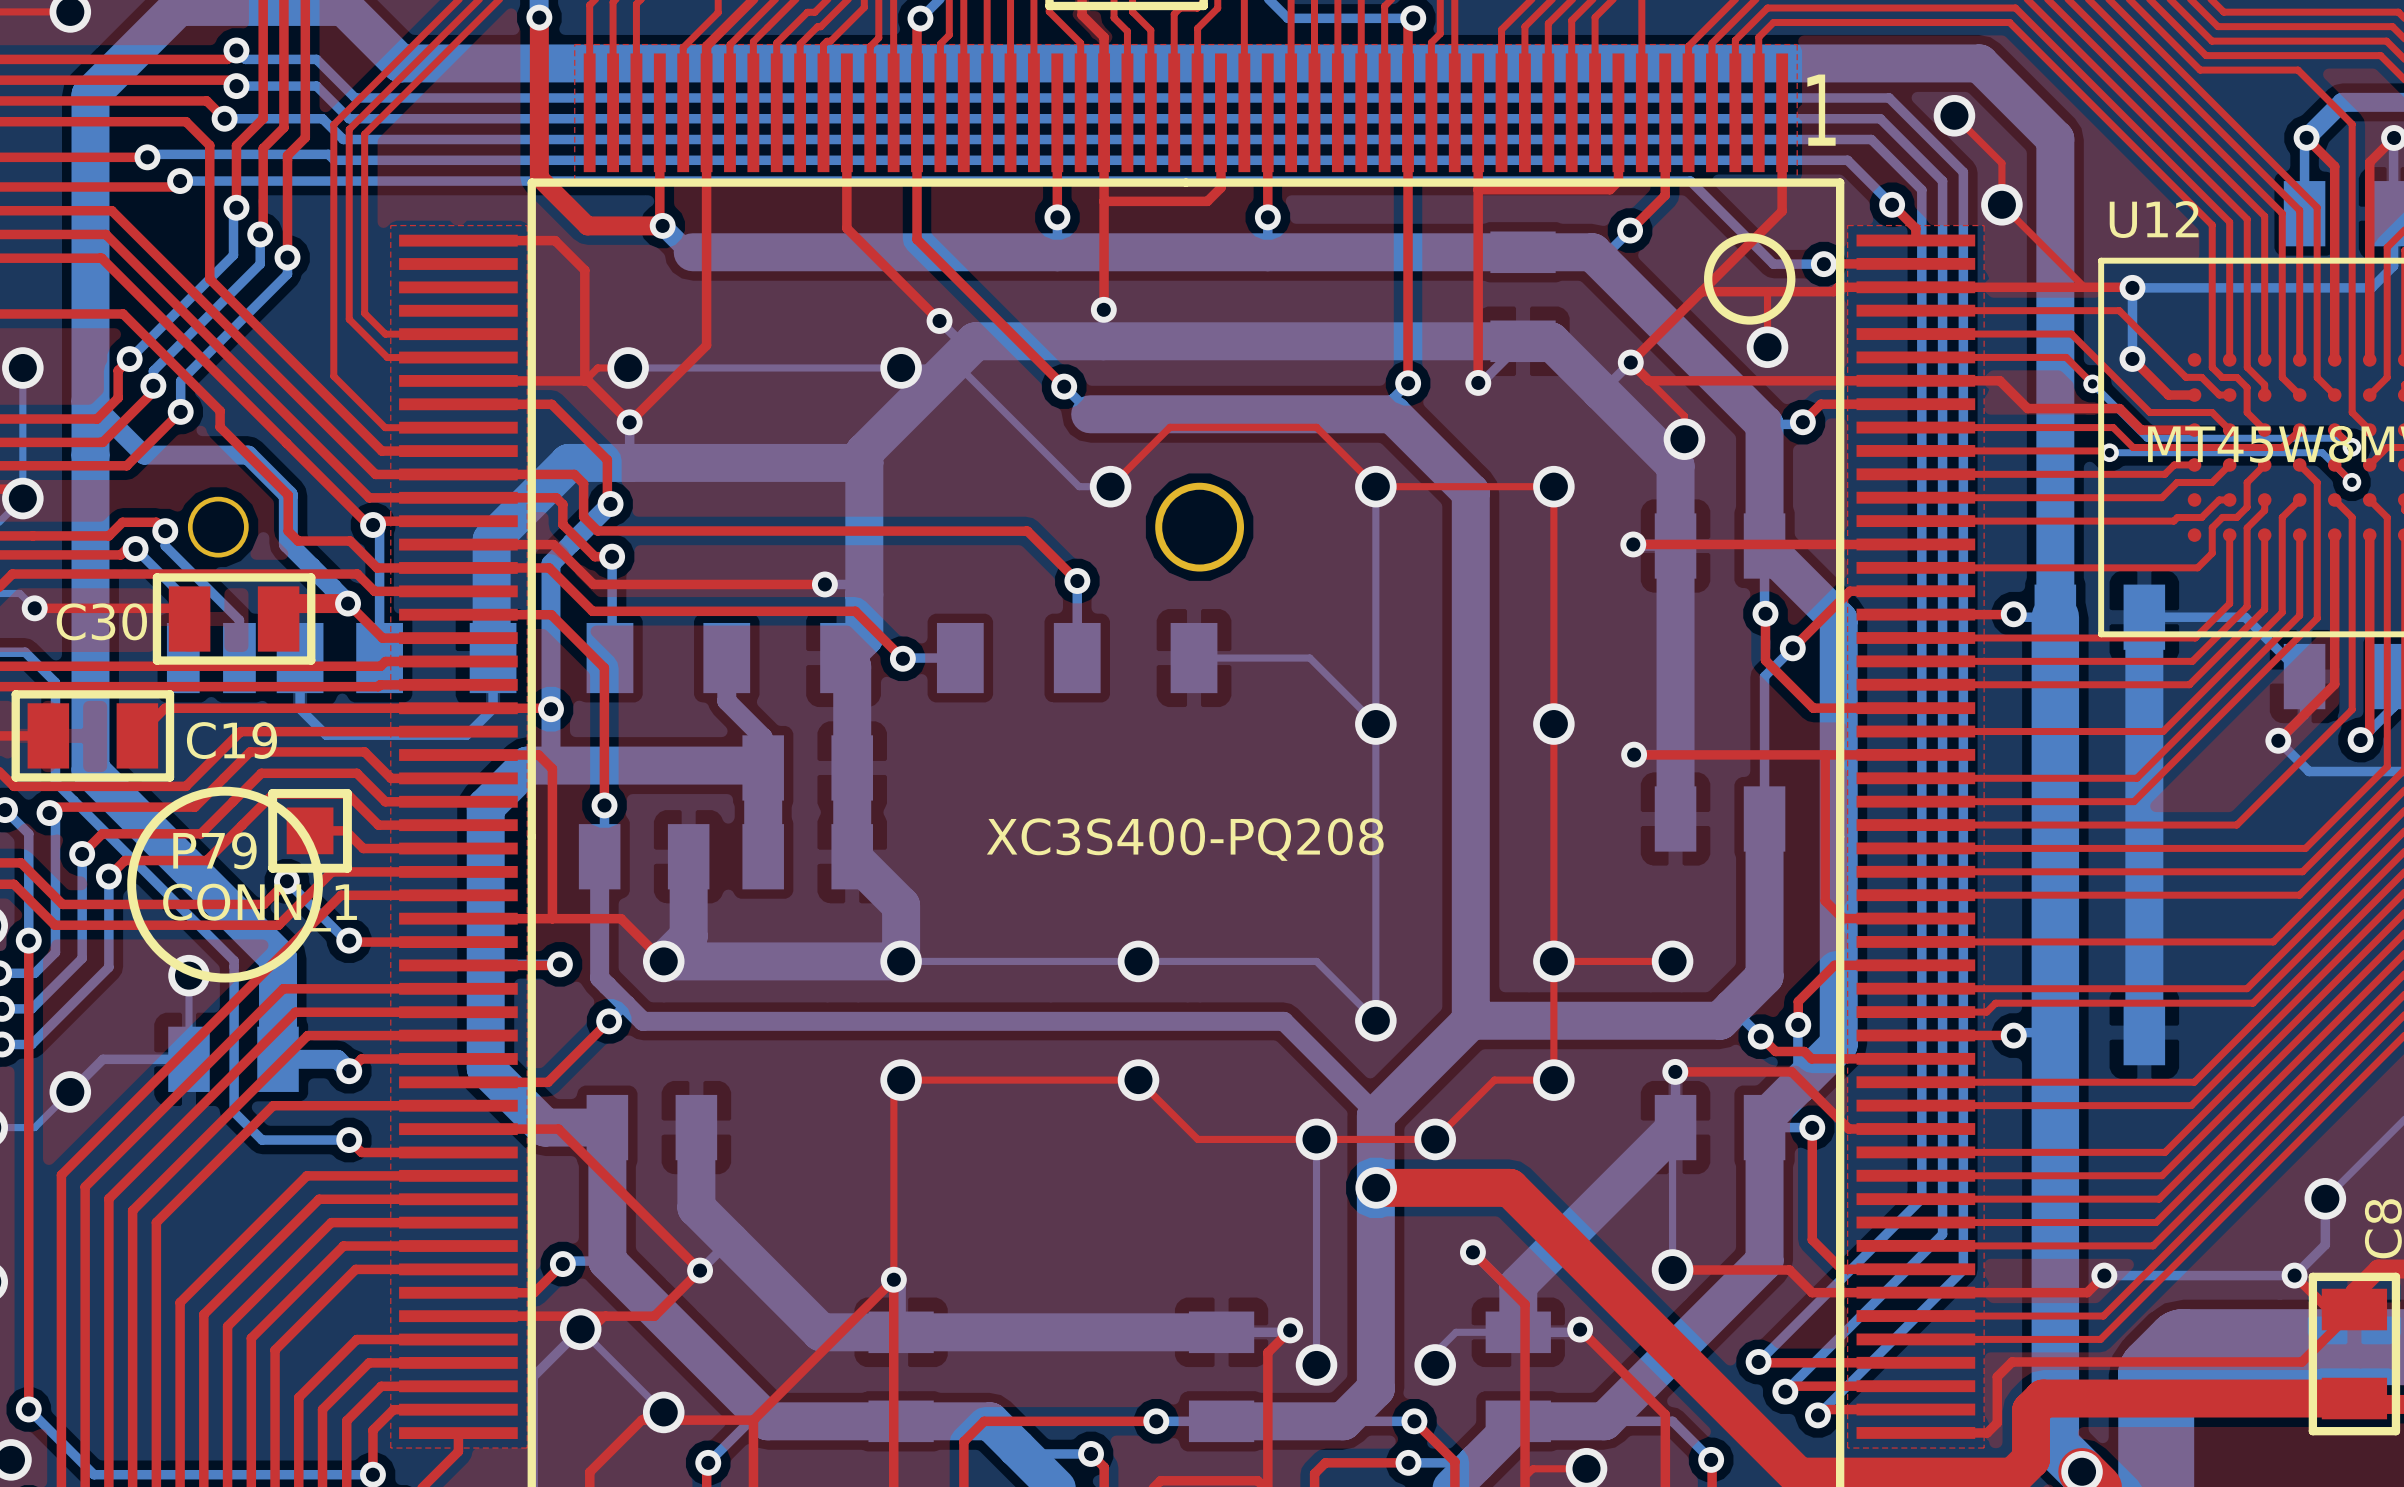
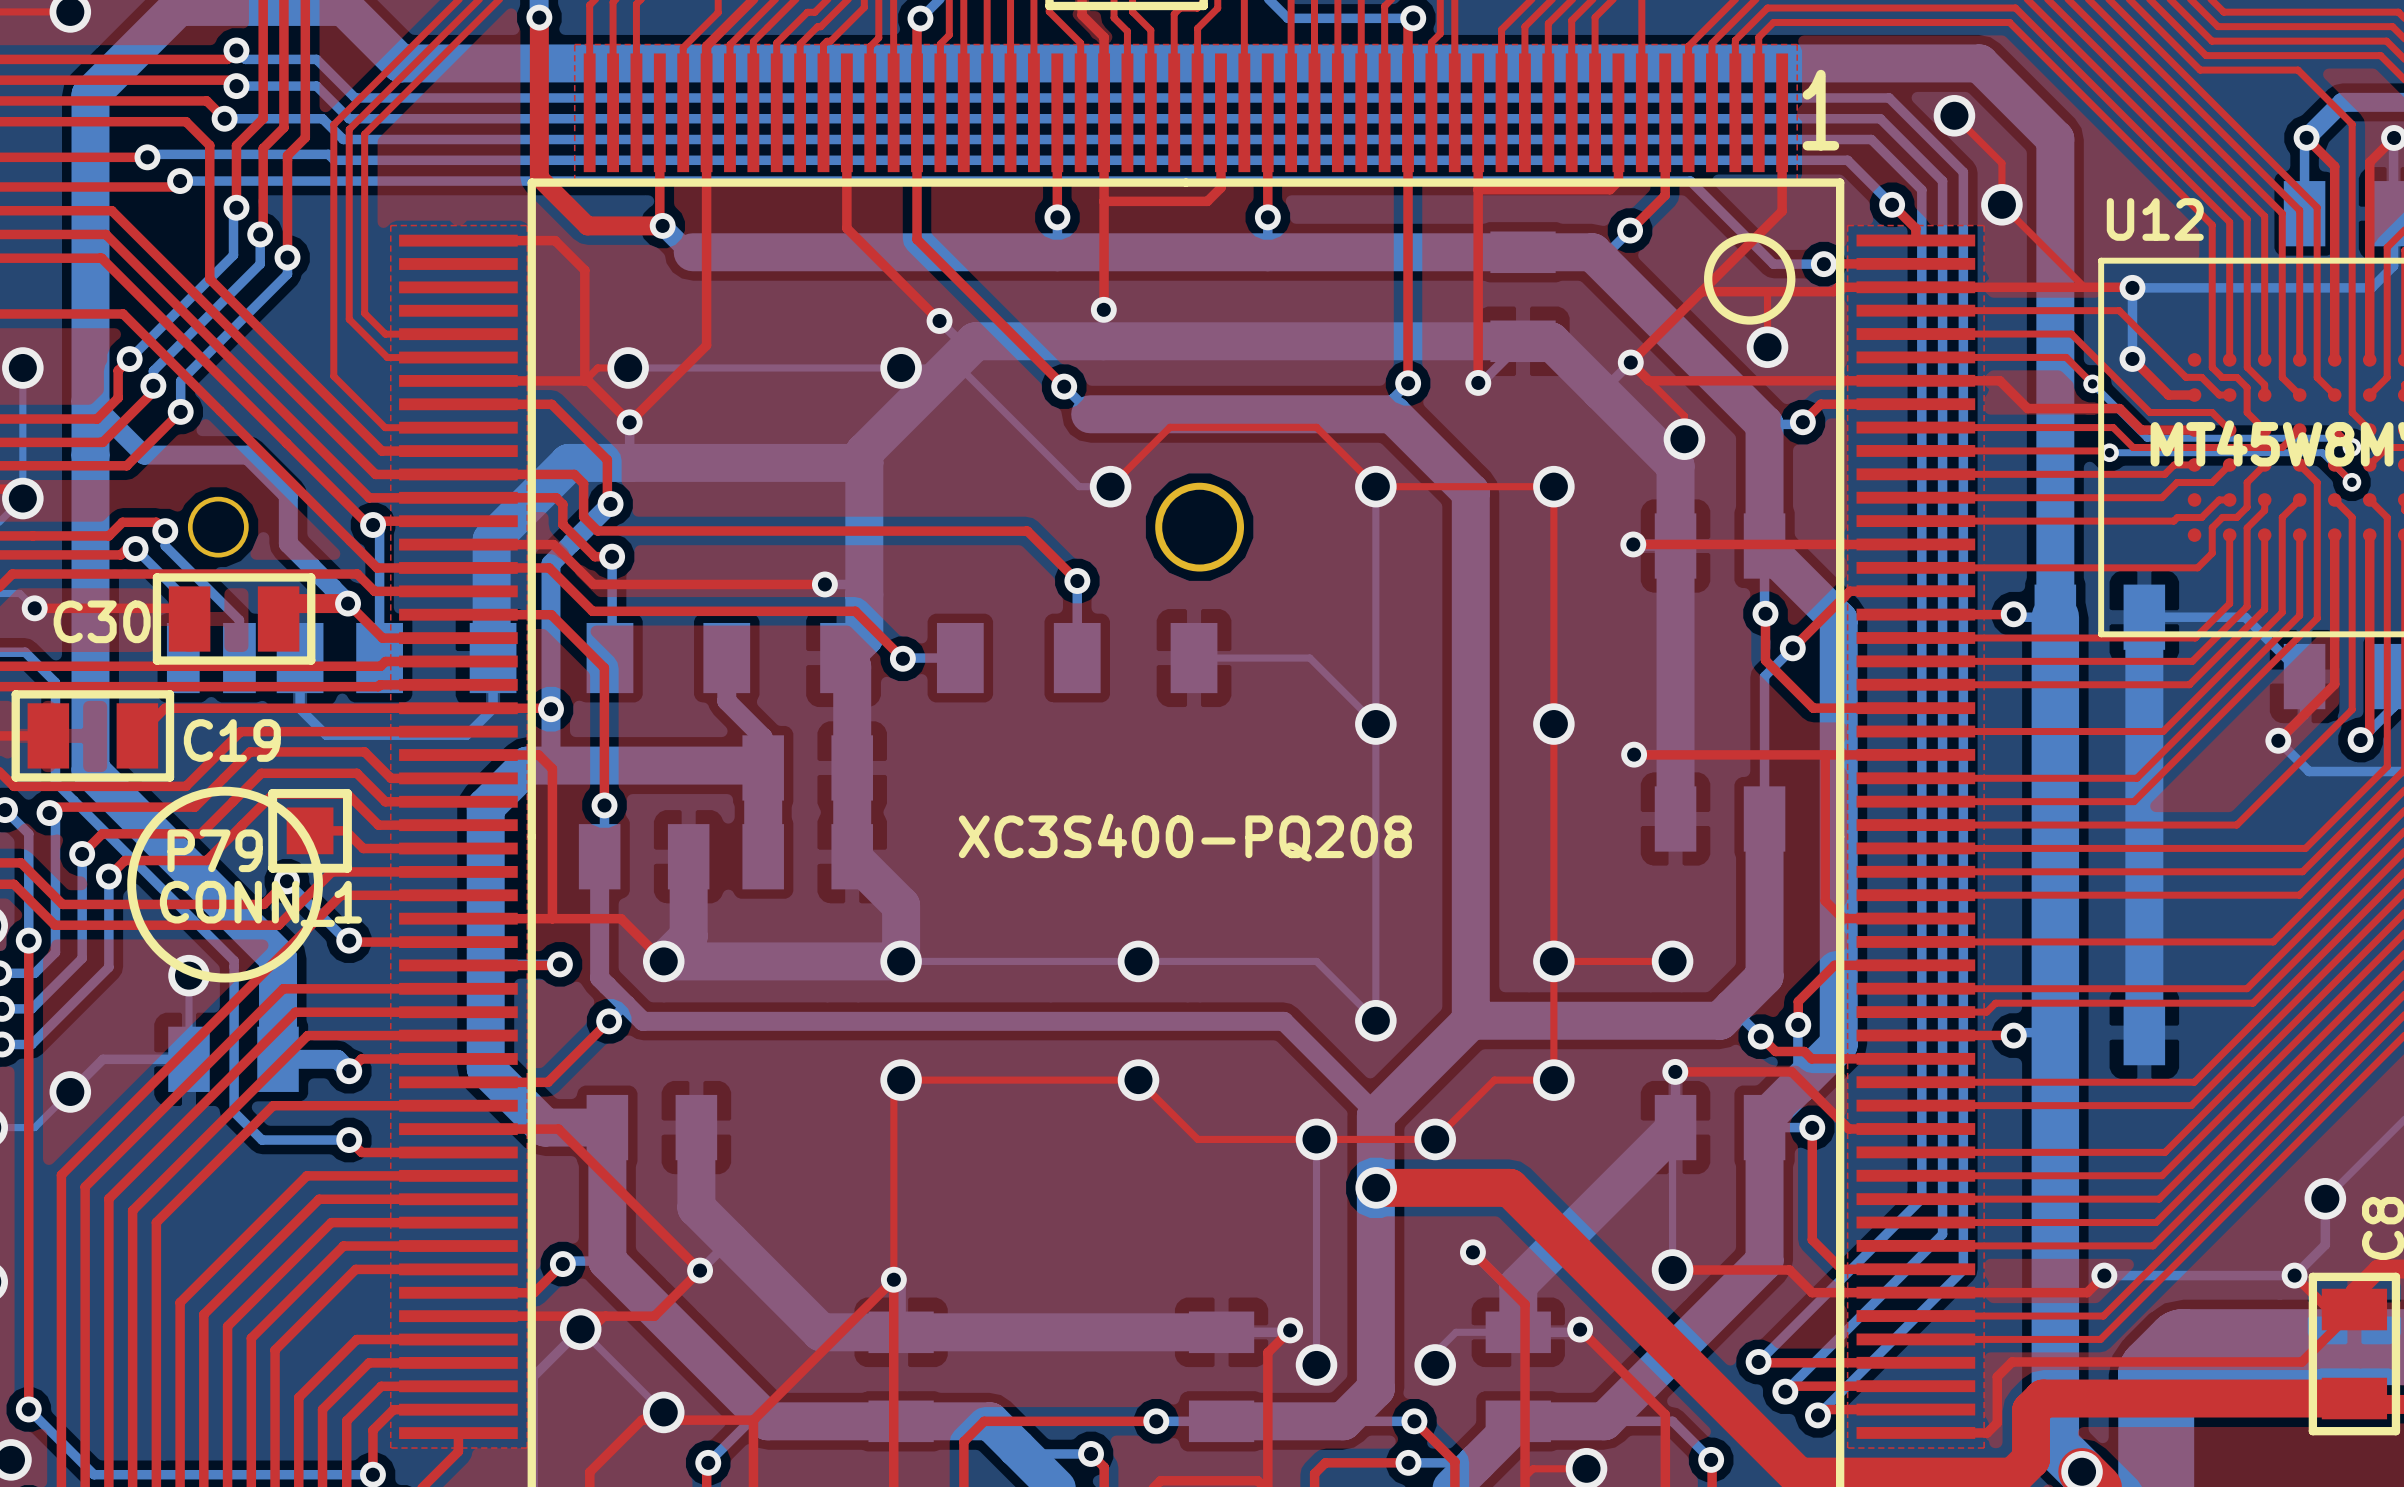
top track: (220, 410) (220, 427) (288, 495) (288, 531) (298, 541) (350, 541) -> (220, 410) (350, 541)

